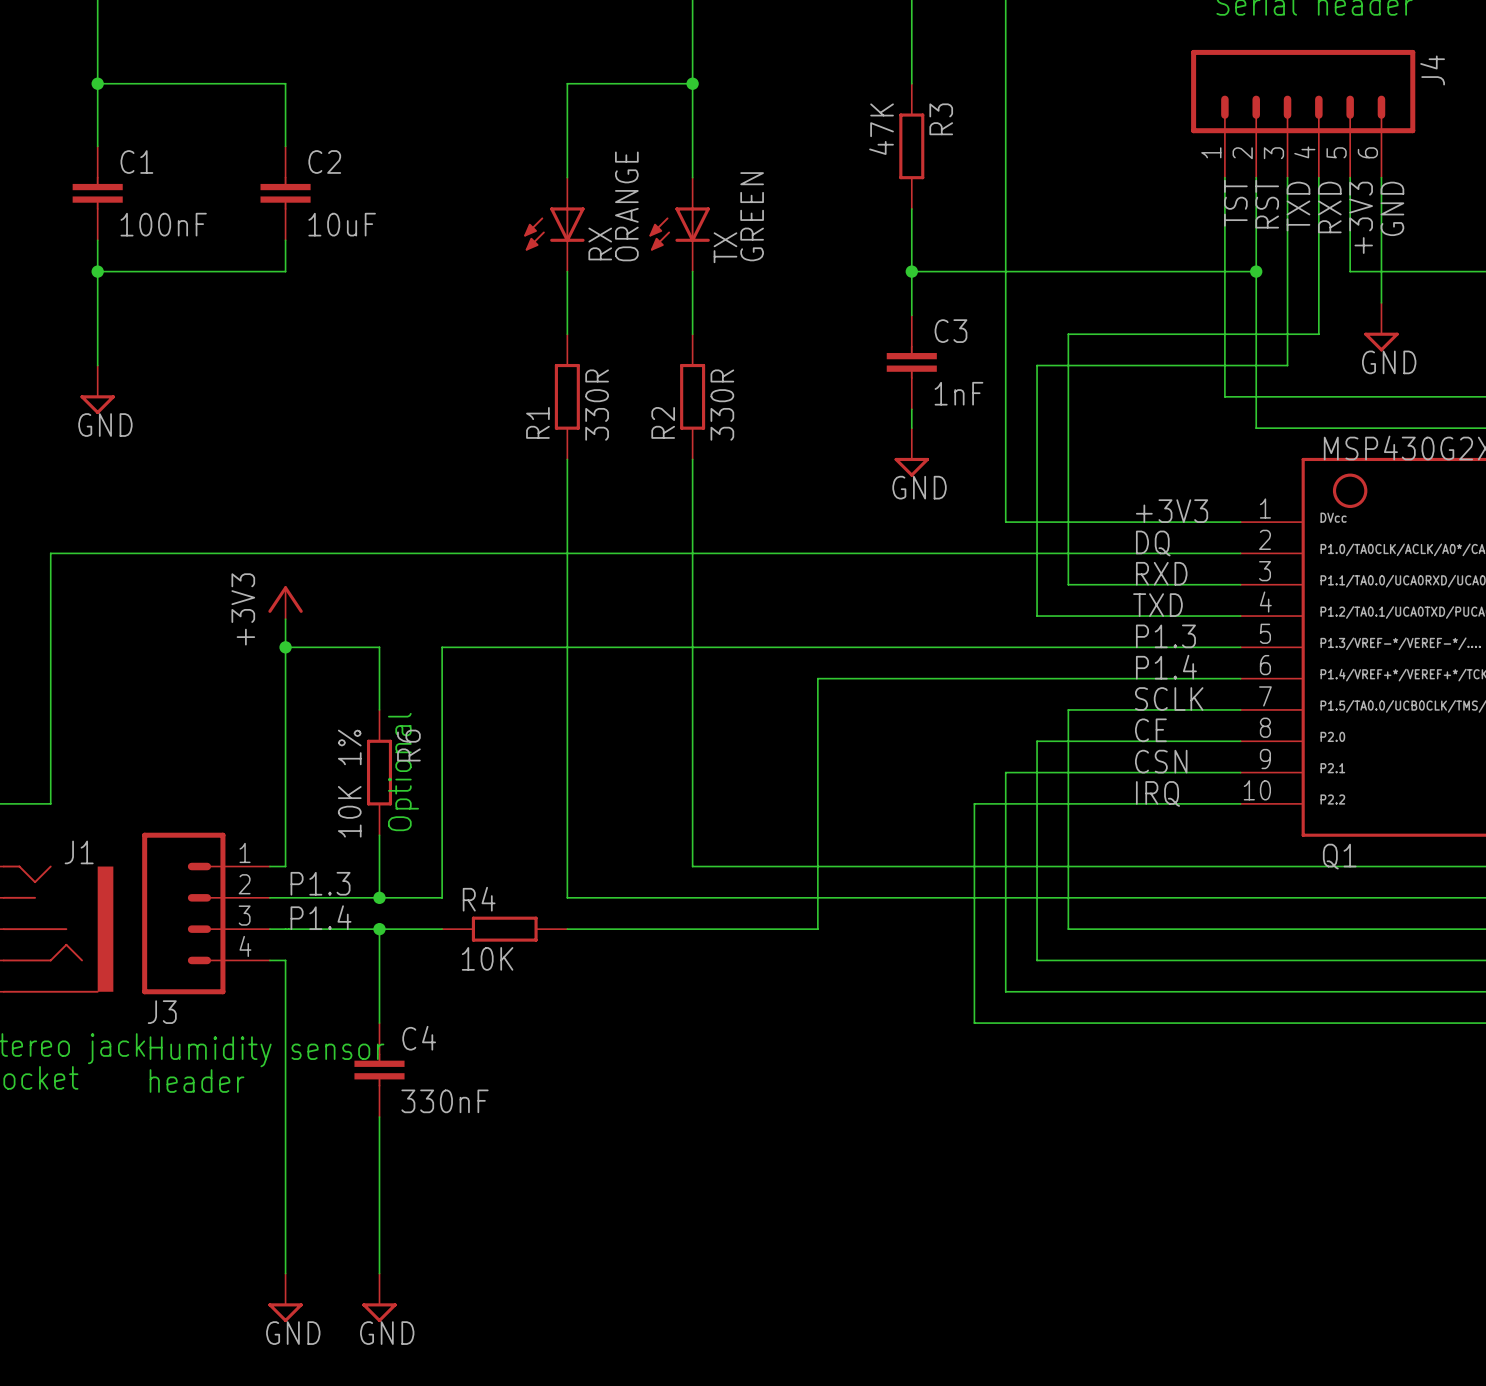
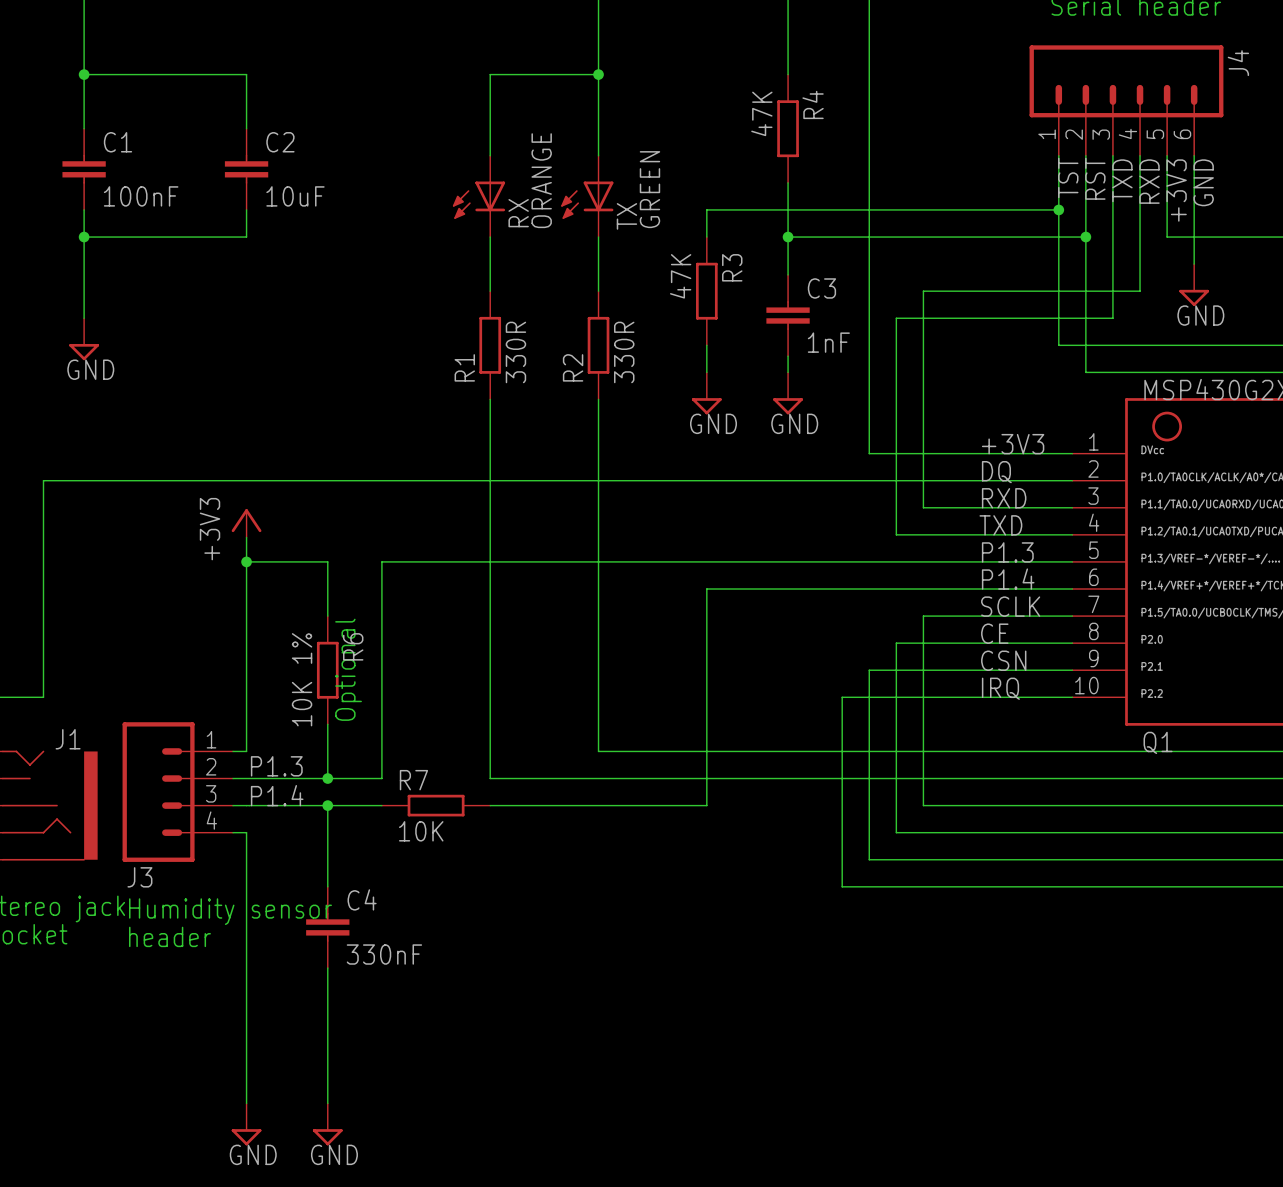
R3 name: R3 (941, 119) -> R4 (813, 104)
wire: none -> (1058, 209) (706, 209) (706, 237)
junction: none -> (1058, 209)
R3: none -> 47K (706, 291)
wire: none -> (706, 345) (706, 372)
power symbol: none -> GND (706, 393)
R4 name: R4 (479, 899) -> R7 (413, 780)

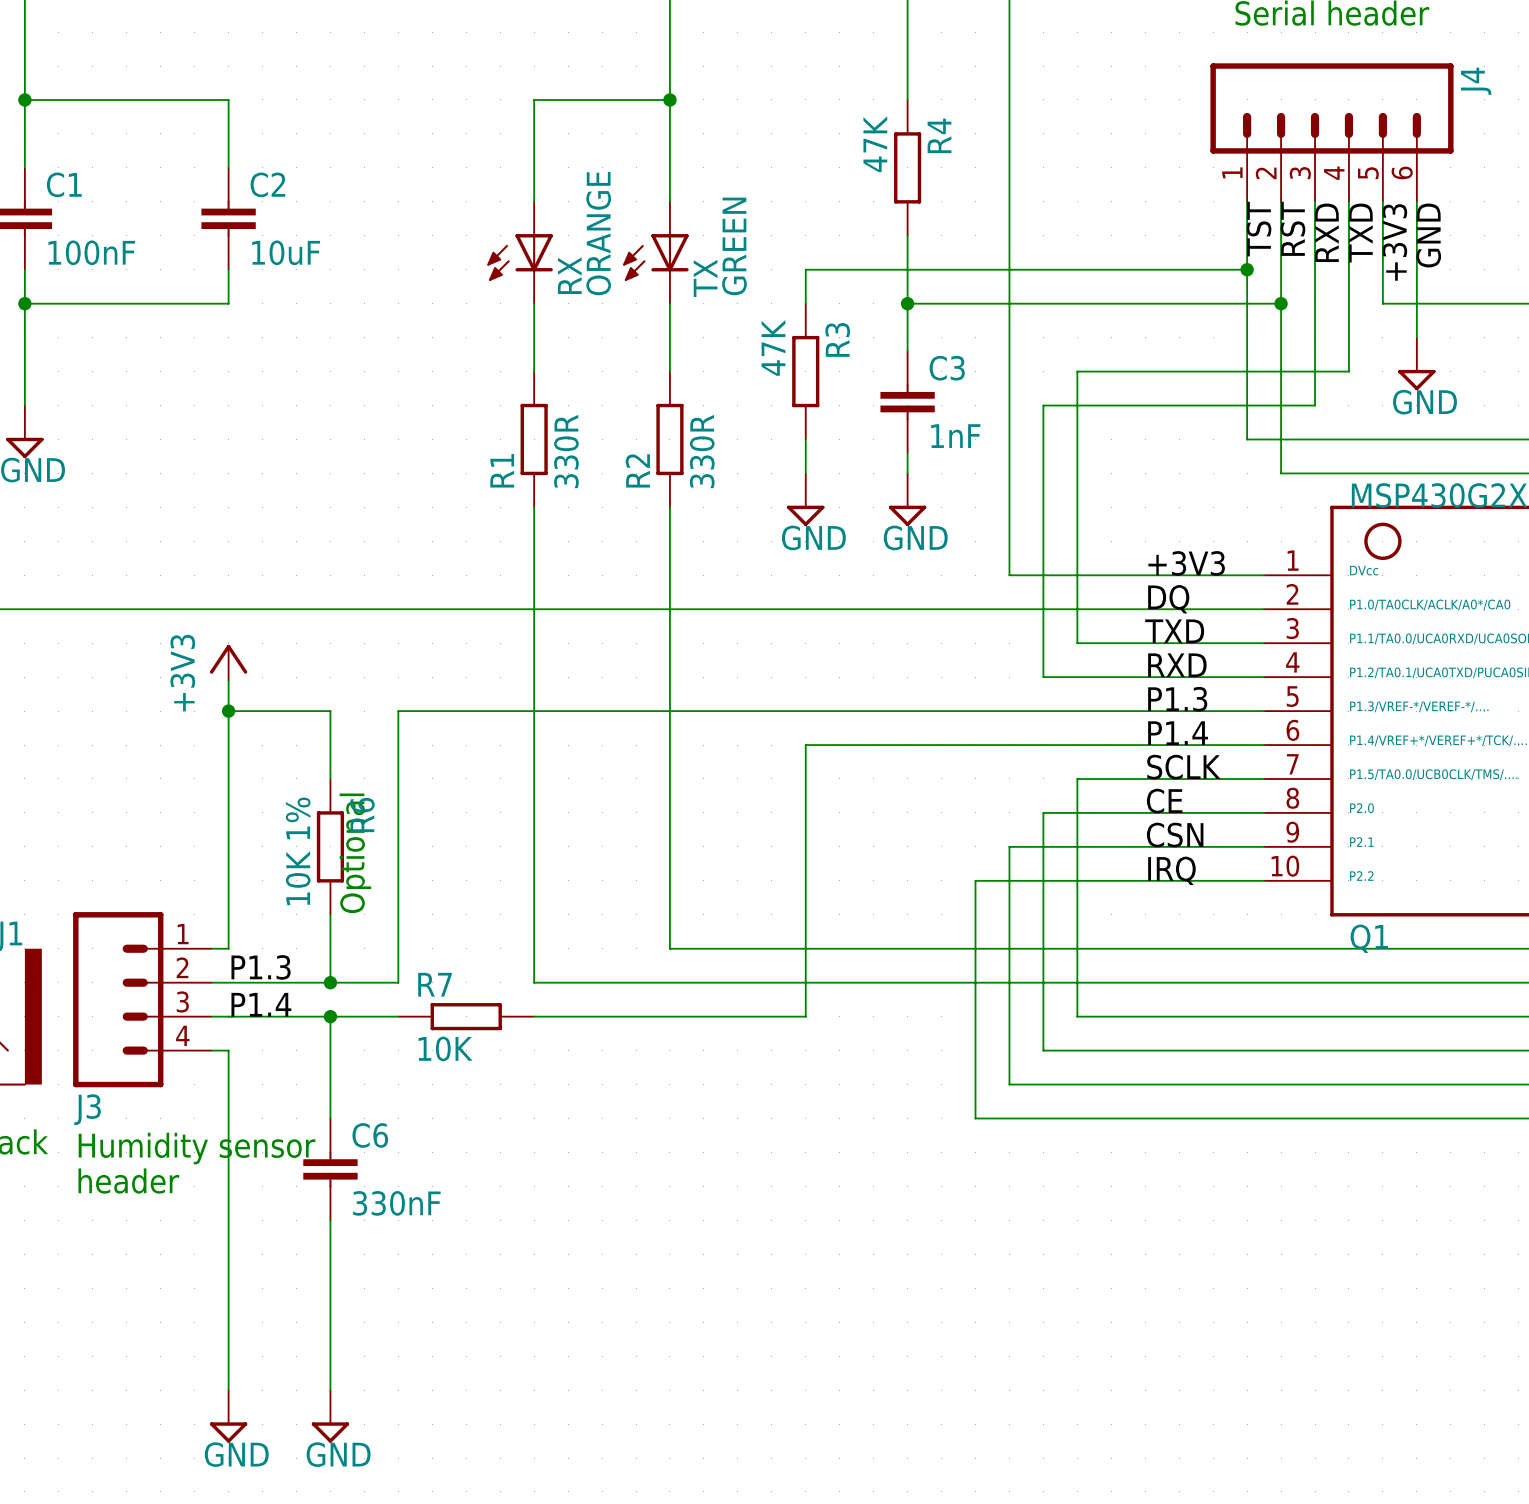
label: TXD (1122, 180) -> RXD (1326, 232)
label: RXD (1149, 181) -> TXD (1360, 233)
label: RXD (1004, 498) -> TXD (1174, 631)
label: TXD (1000, 525) -> RXD (1177, 665)
C4 name: C4 (362, 899) -> C6 (370, 1135)

